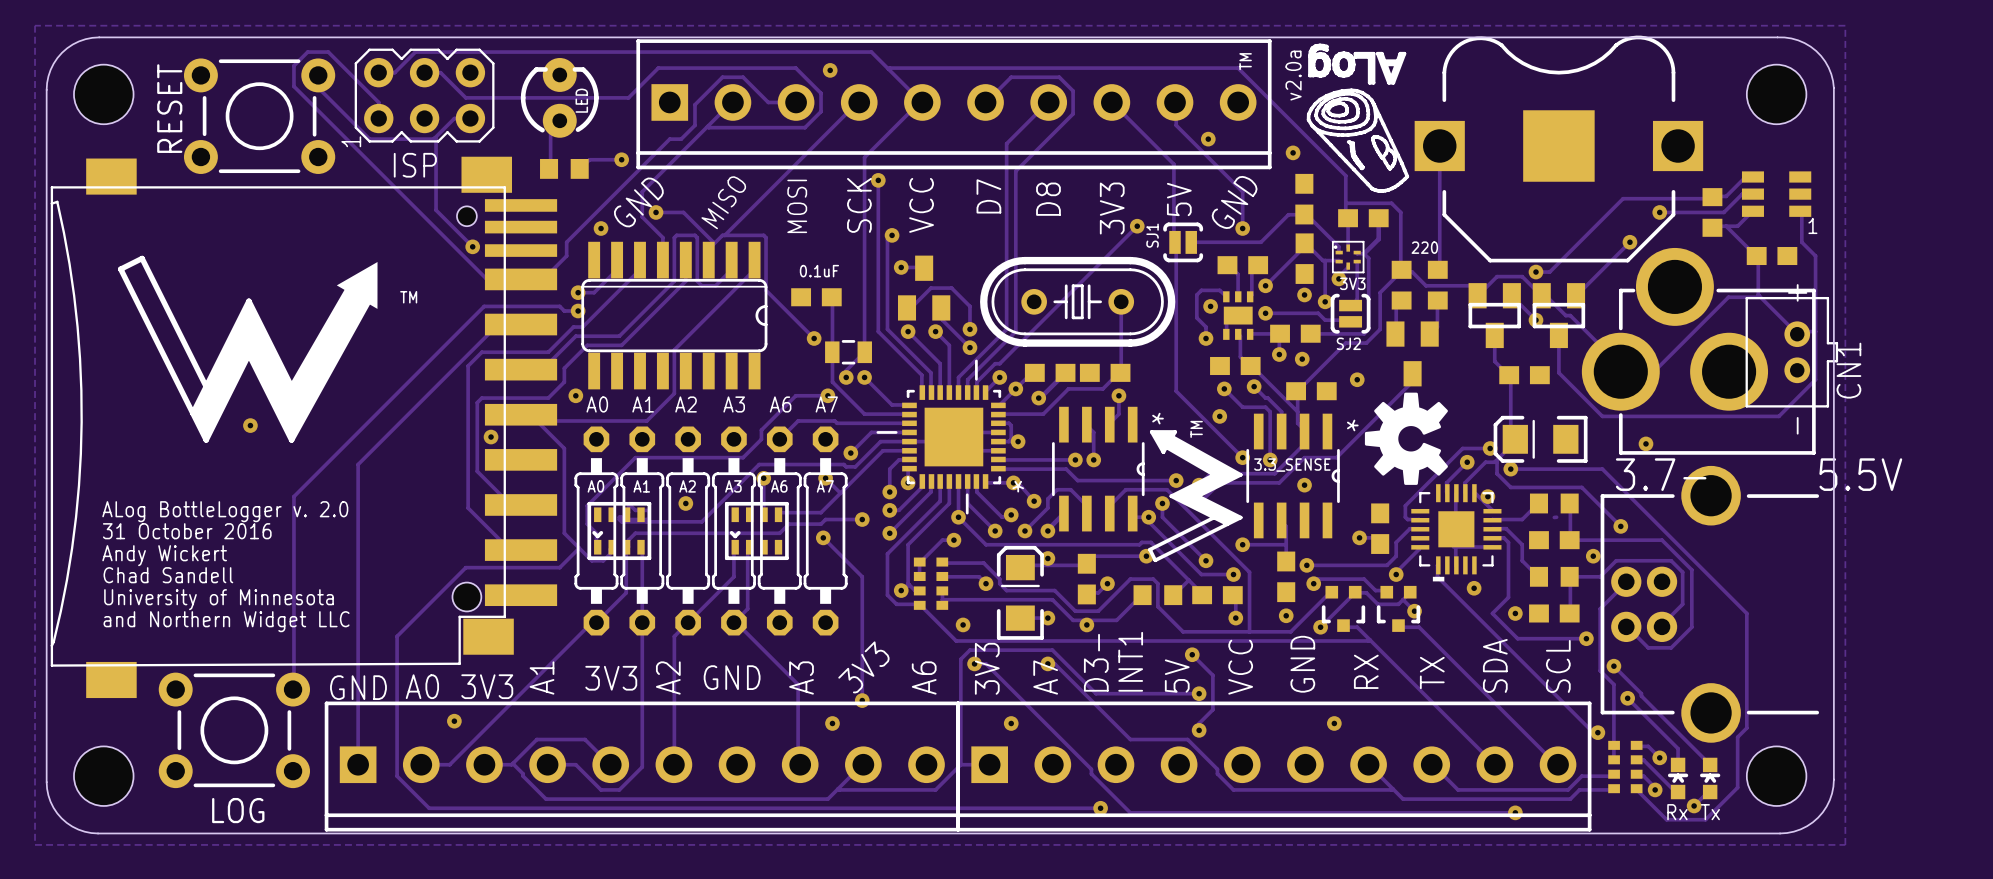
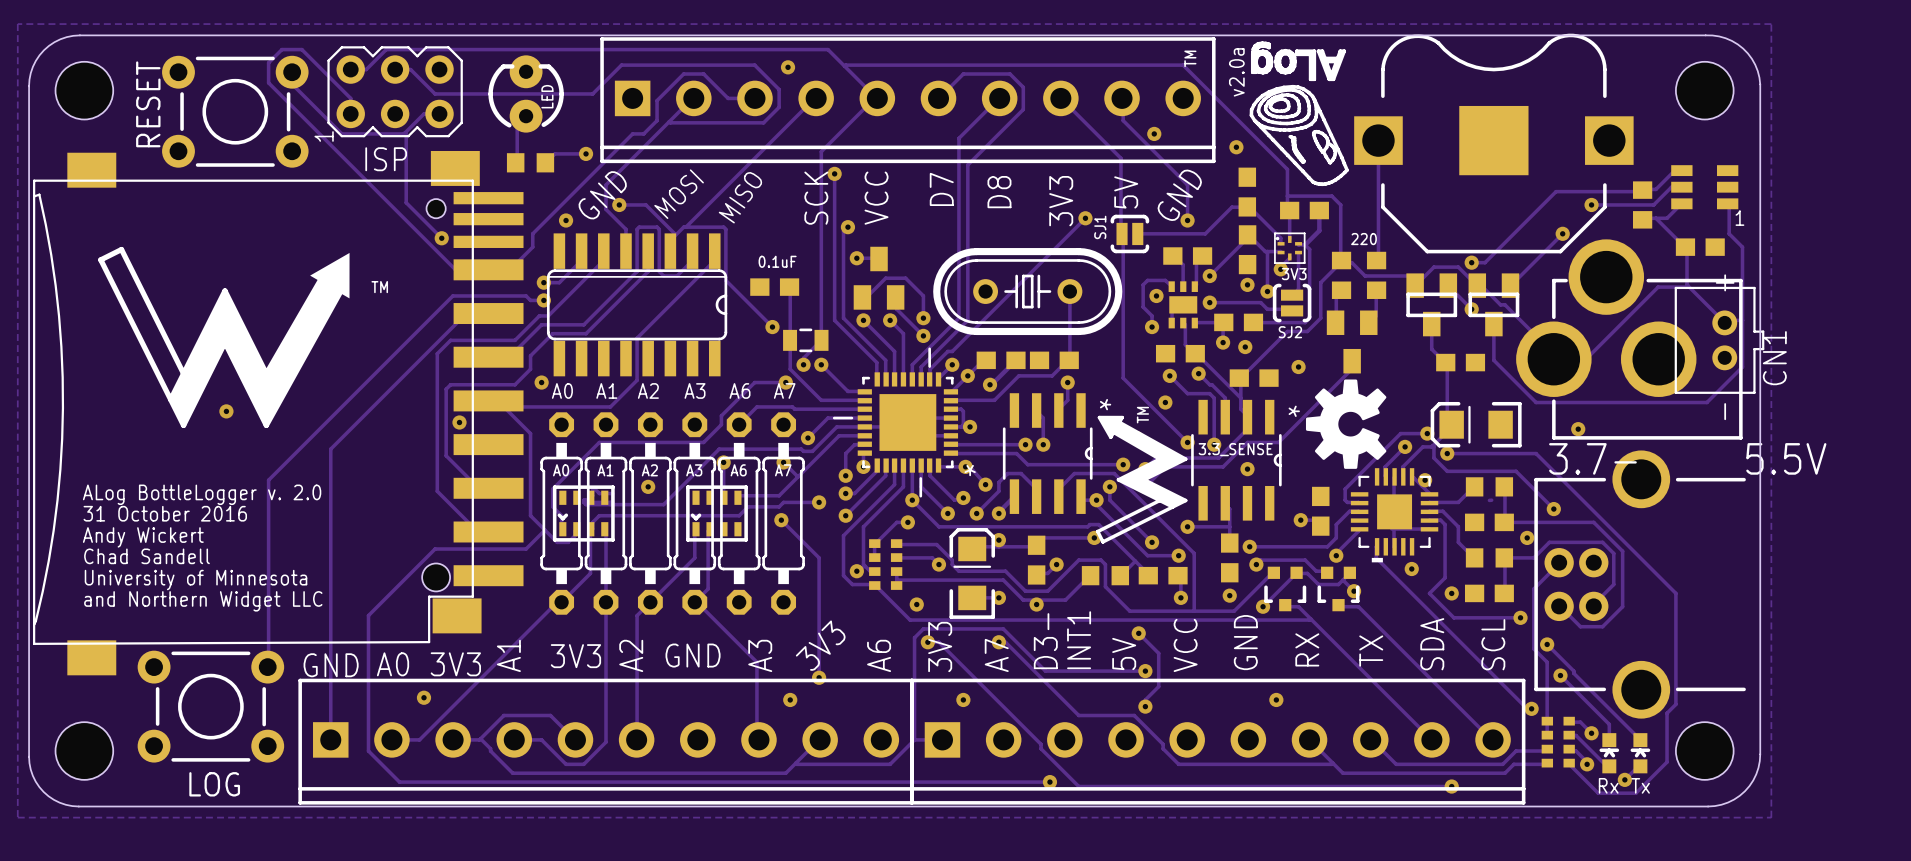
text position: MISO (723, 202) -> MISO (740, 197)
text rotation: 0° (797, 206) -> 45° clockwise (679, 194)
text position: MOSI (797, 206) -> MOSI (679, 194)

